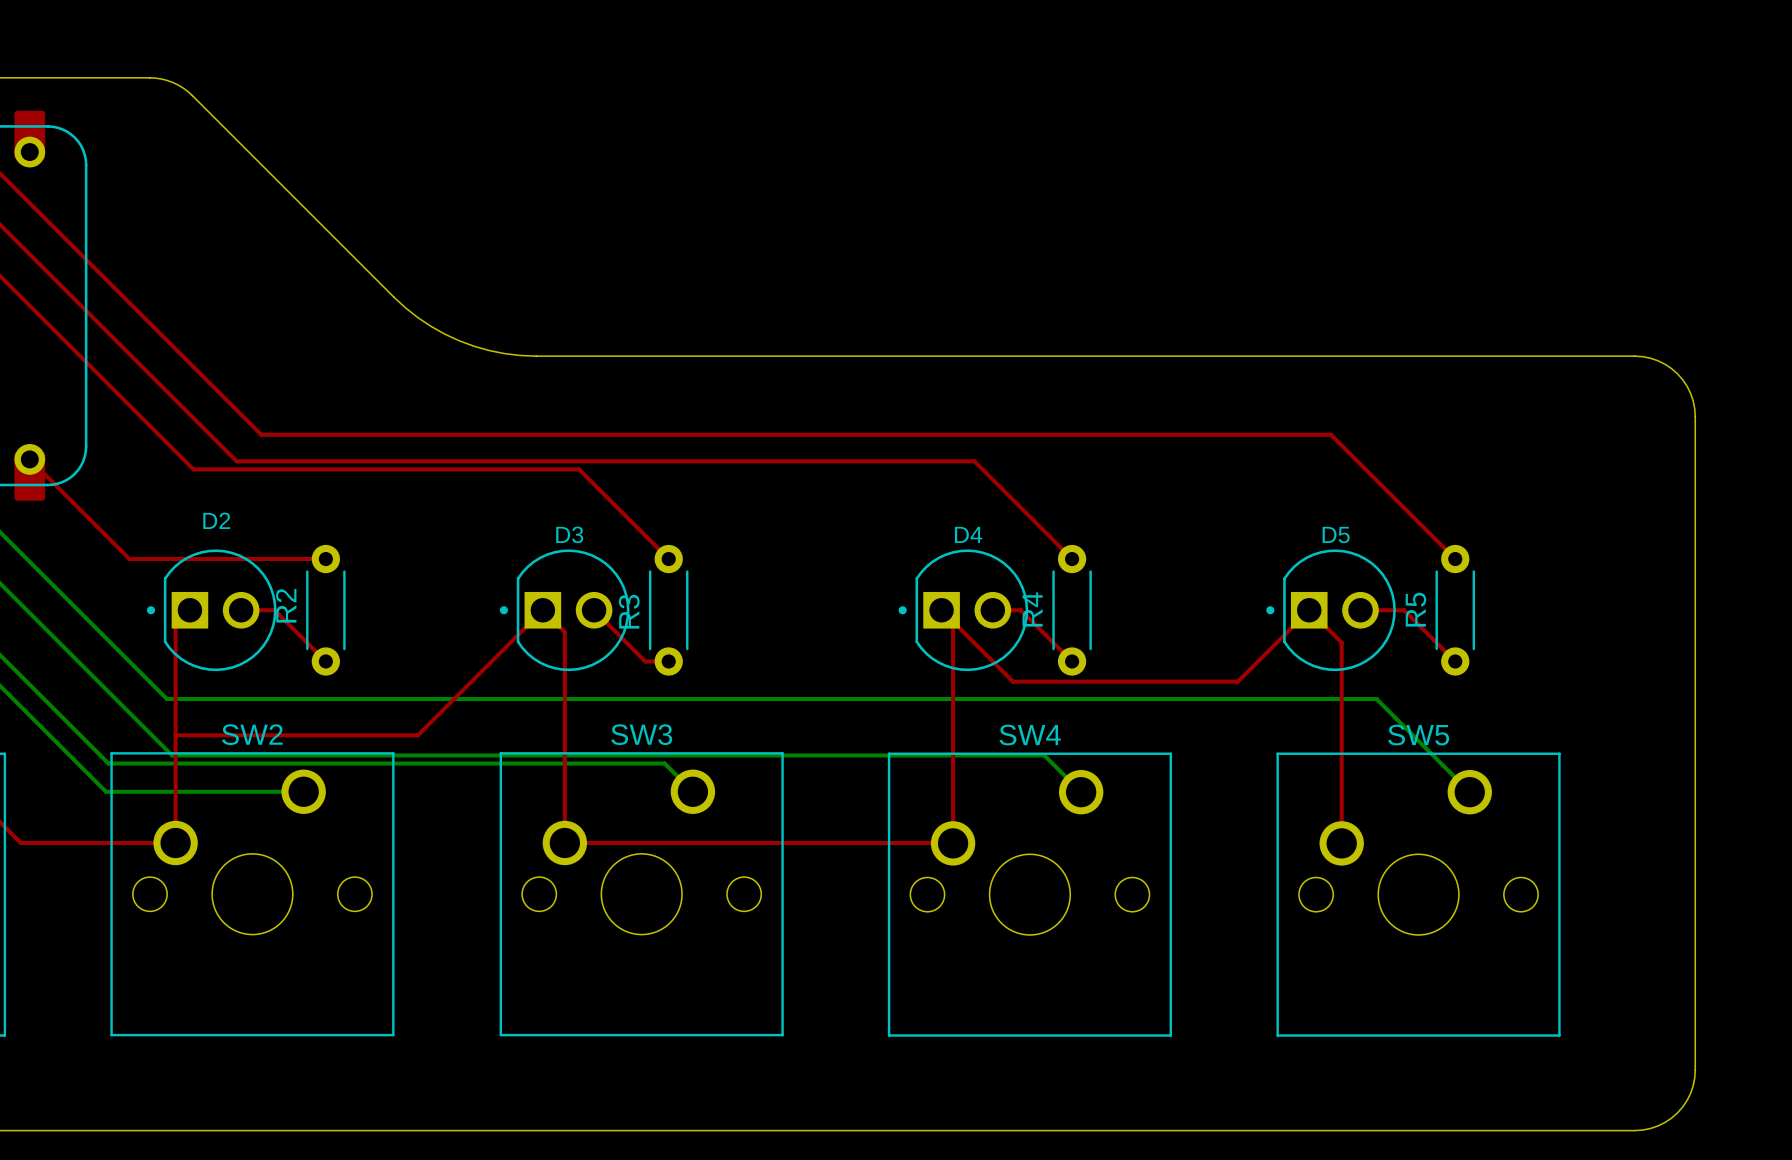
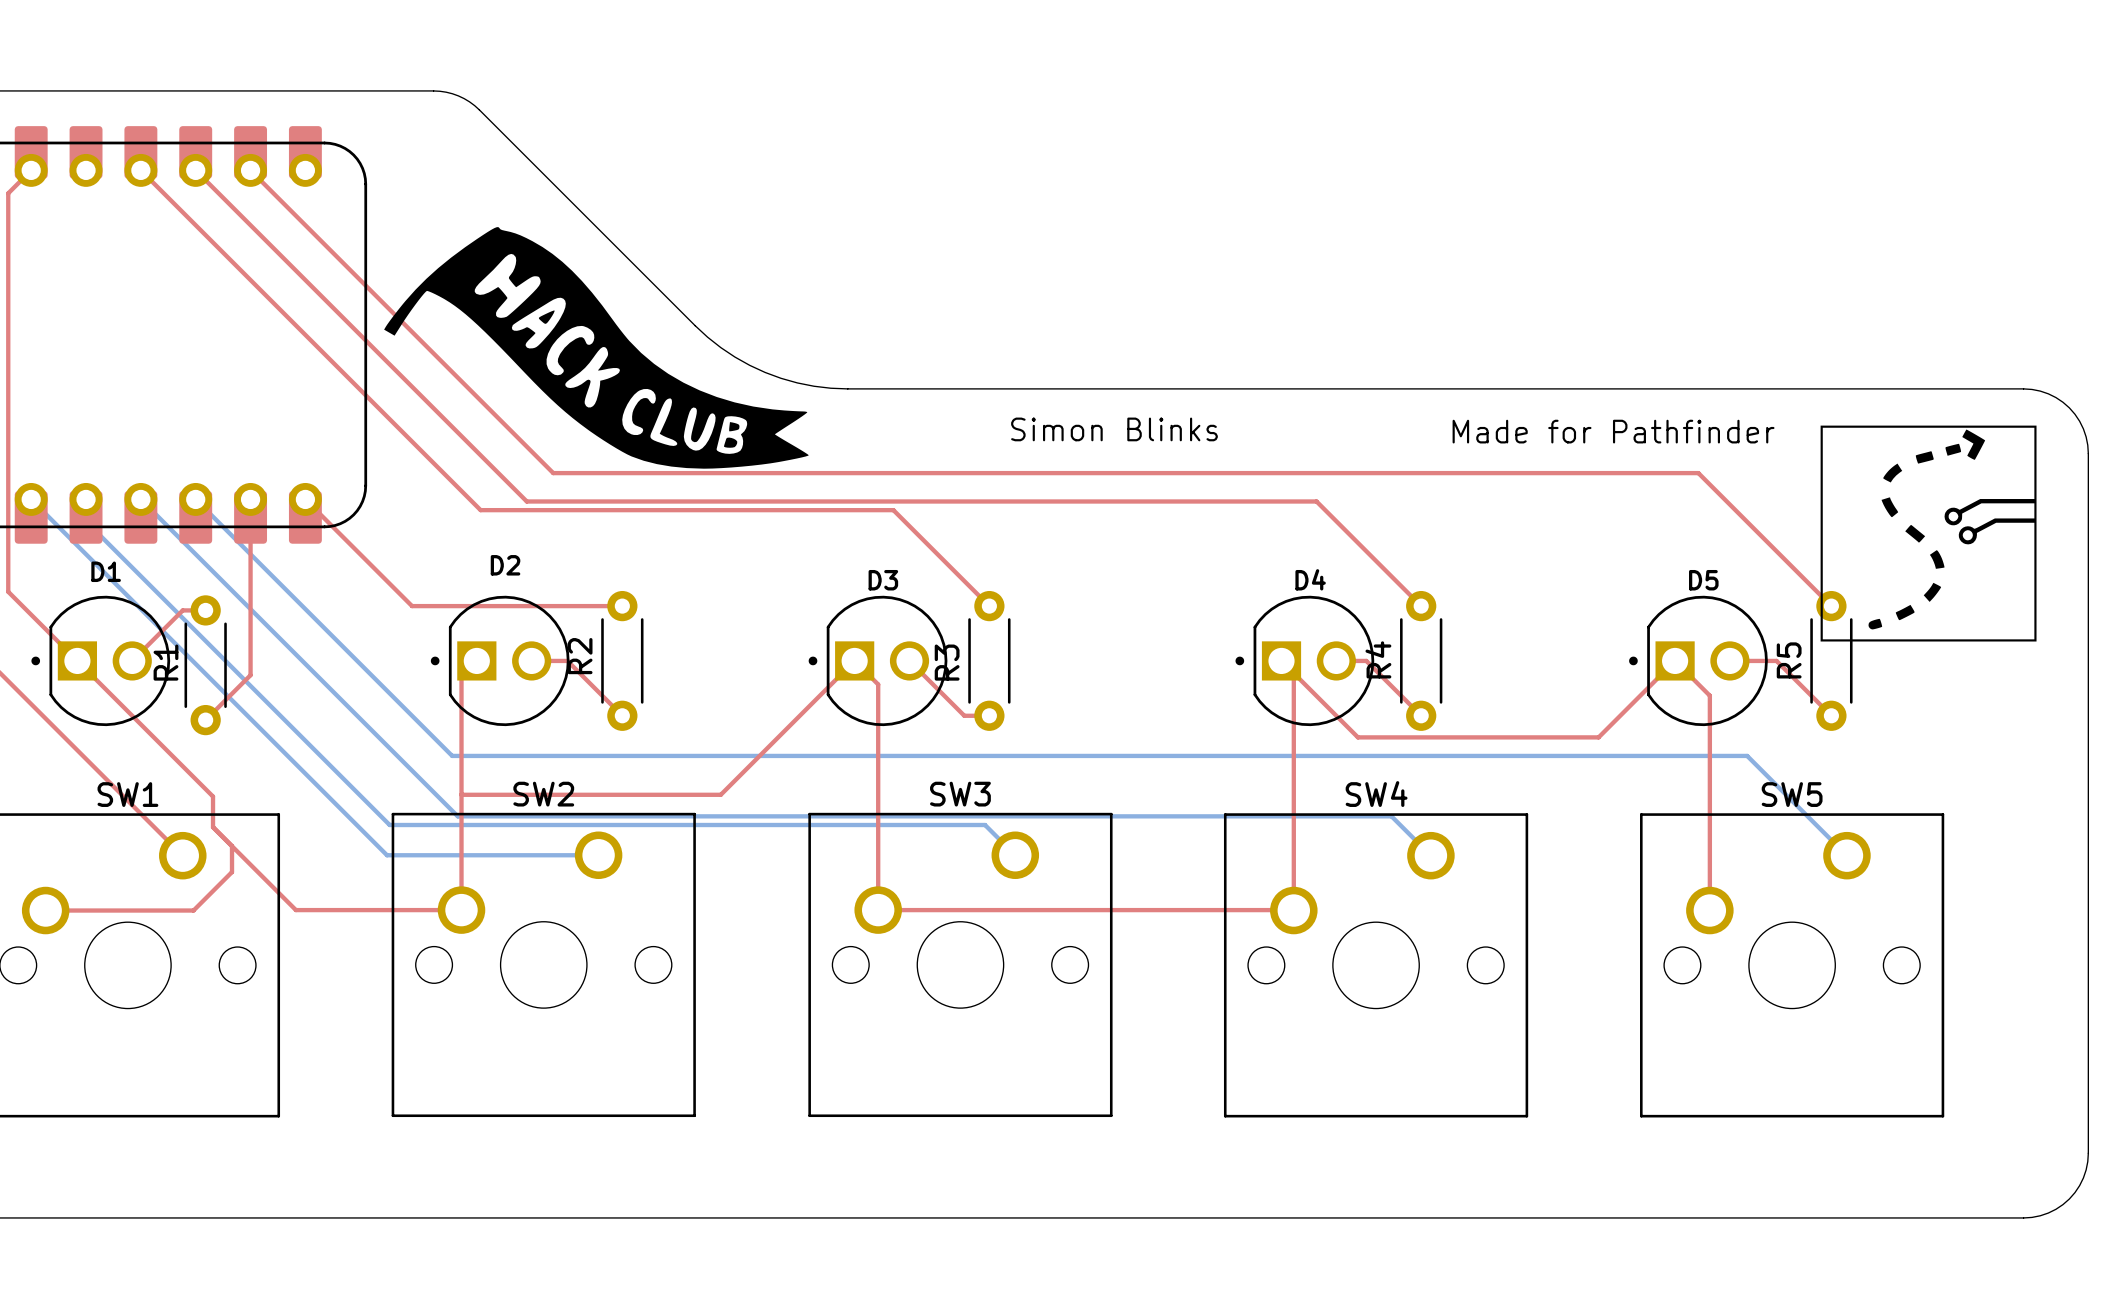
drawing: none -> [384, 227, 809, 469]
drawing: none -> [1820, 425, 2037, 642]
text: none -> Simon Blinks (1114, 429)
text: none -> Made for Pathfinder (1613, 431)

